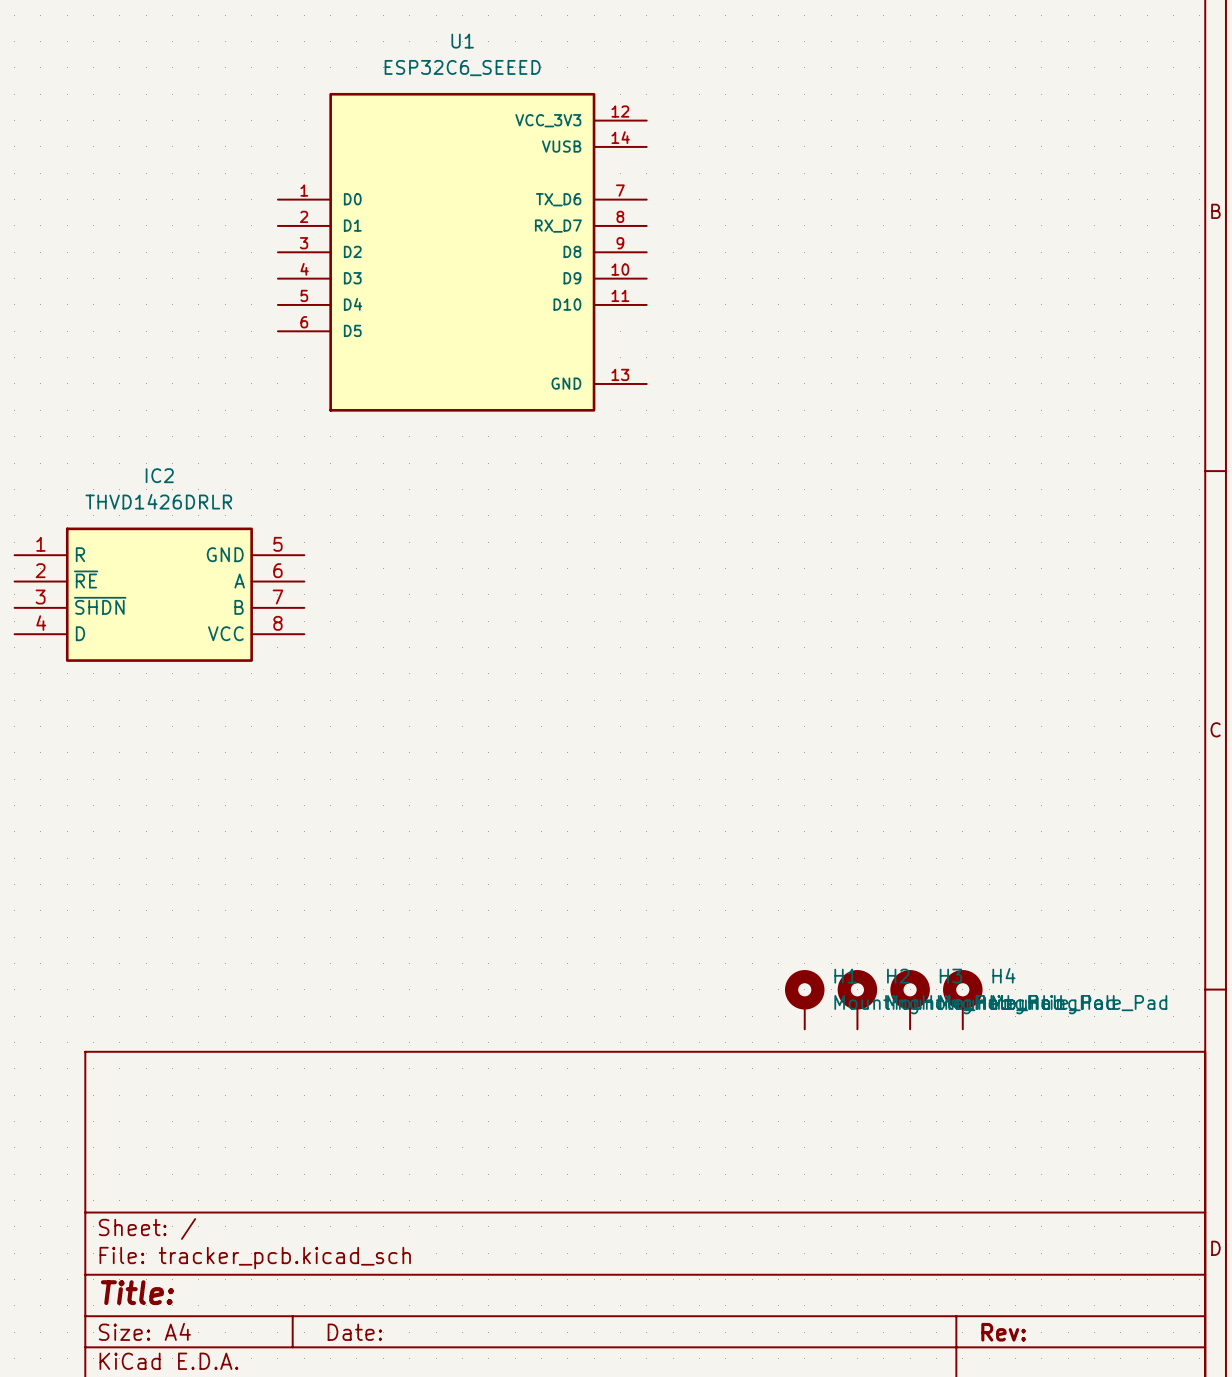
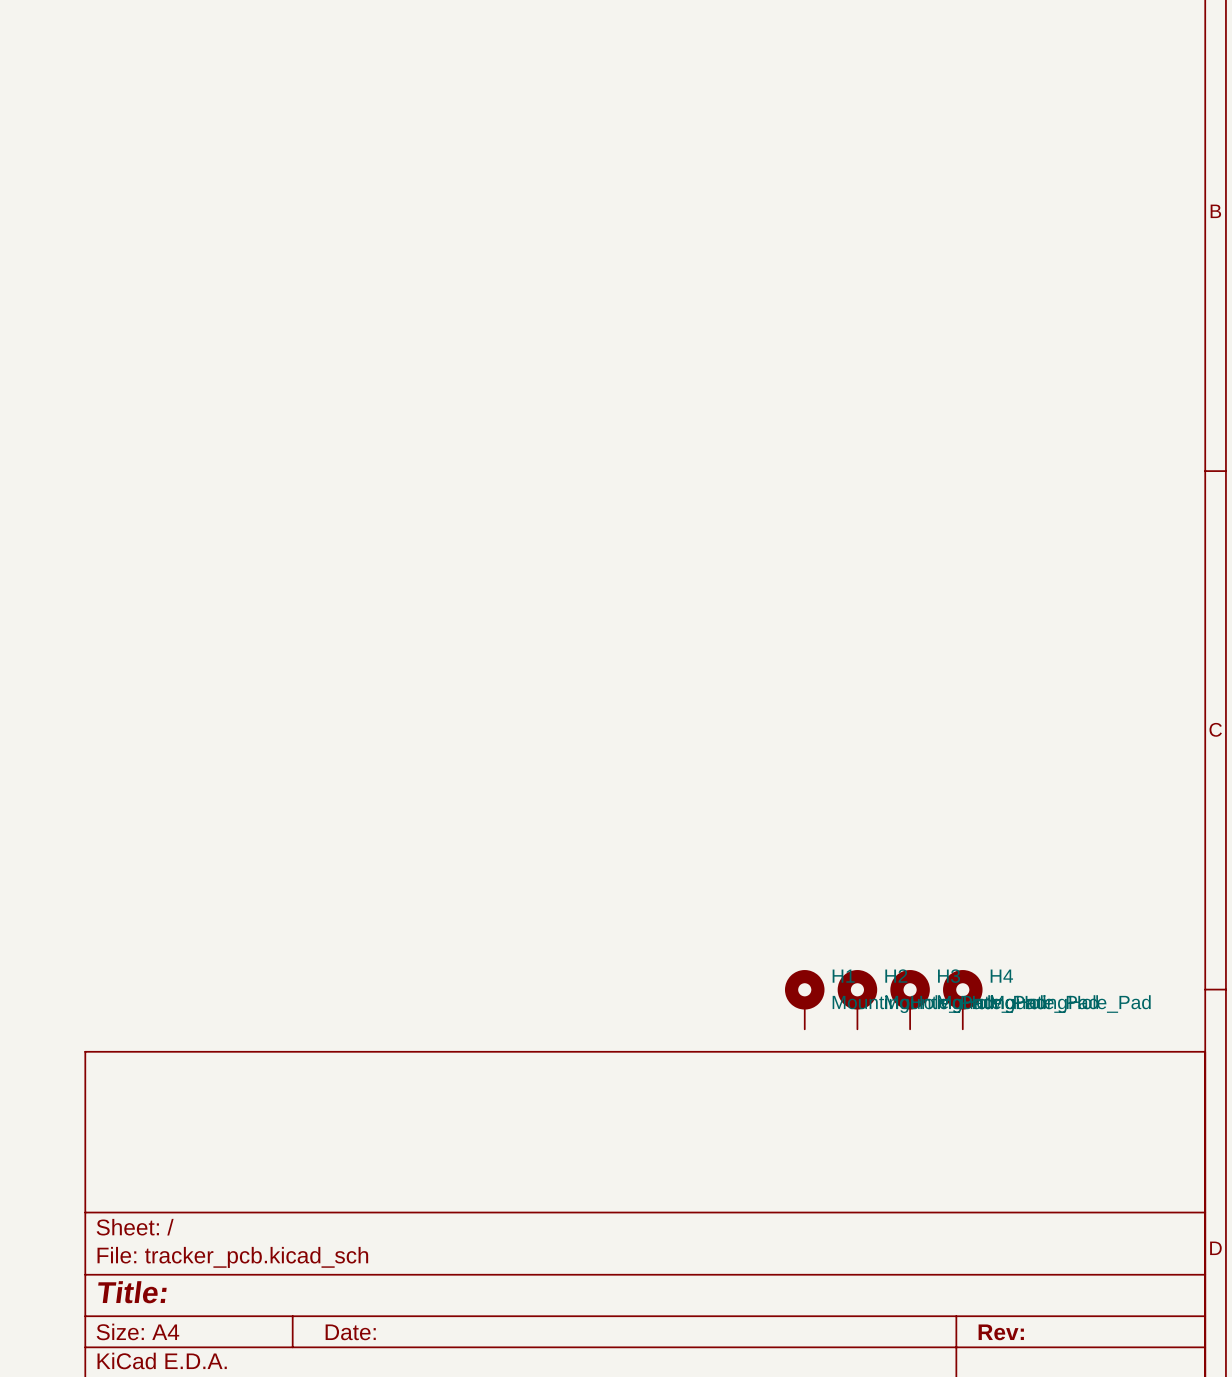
U1: ESP32C6_SEEED (462, 252) -> none
IC2: THVD1426DRLR (159, 594) -> none

